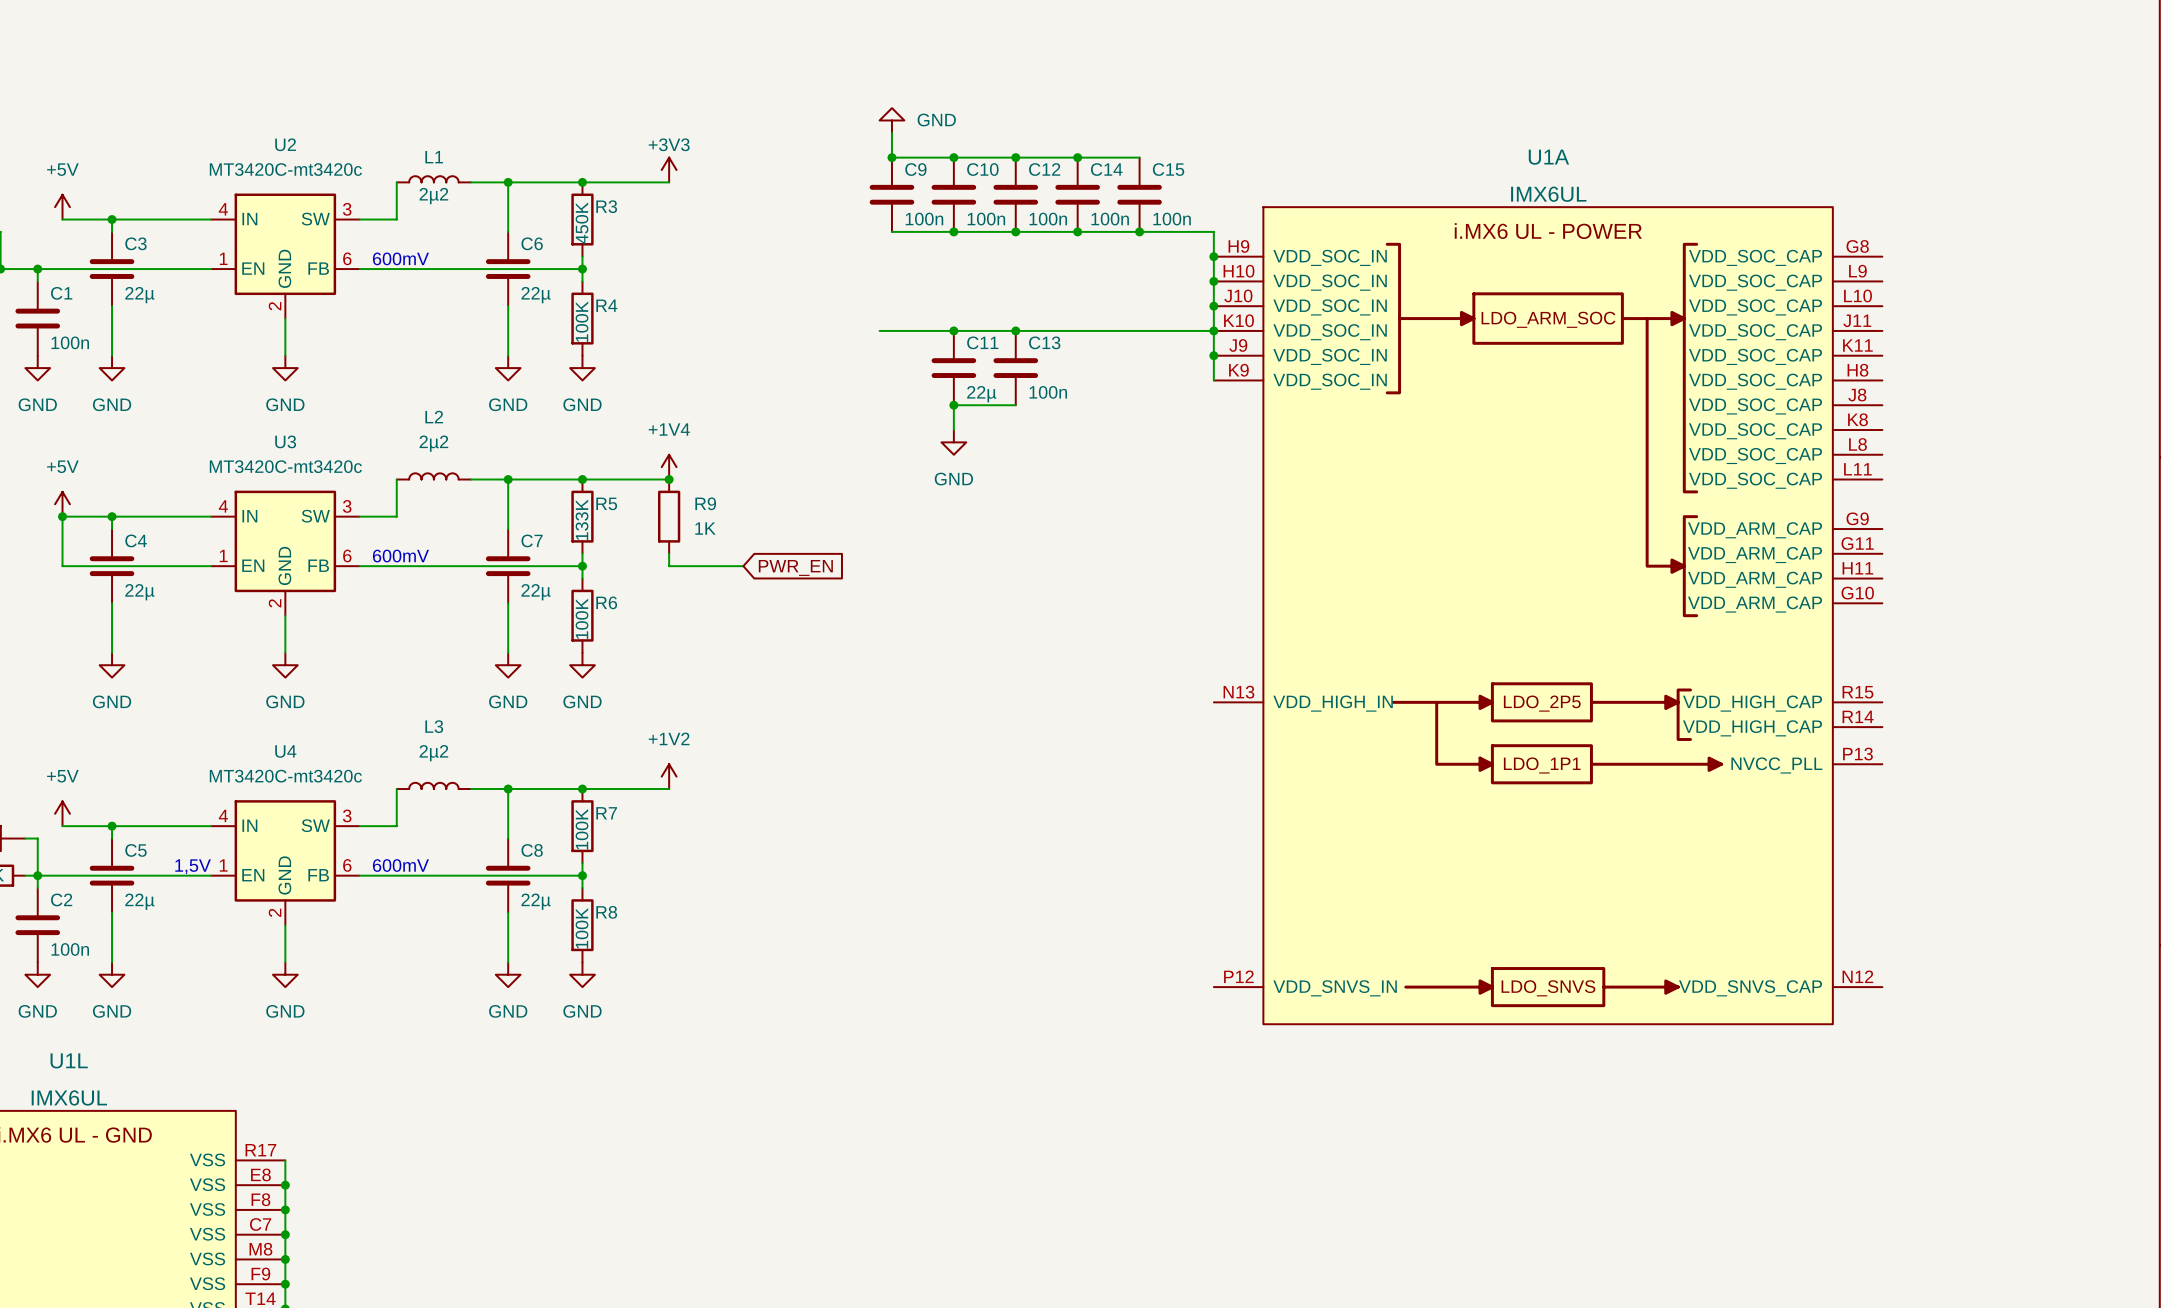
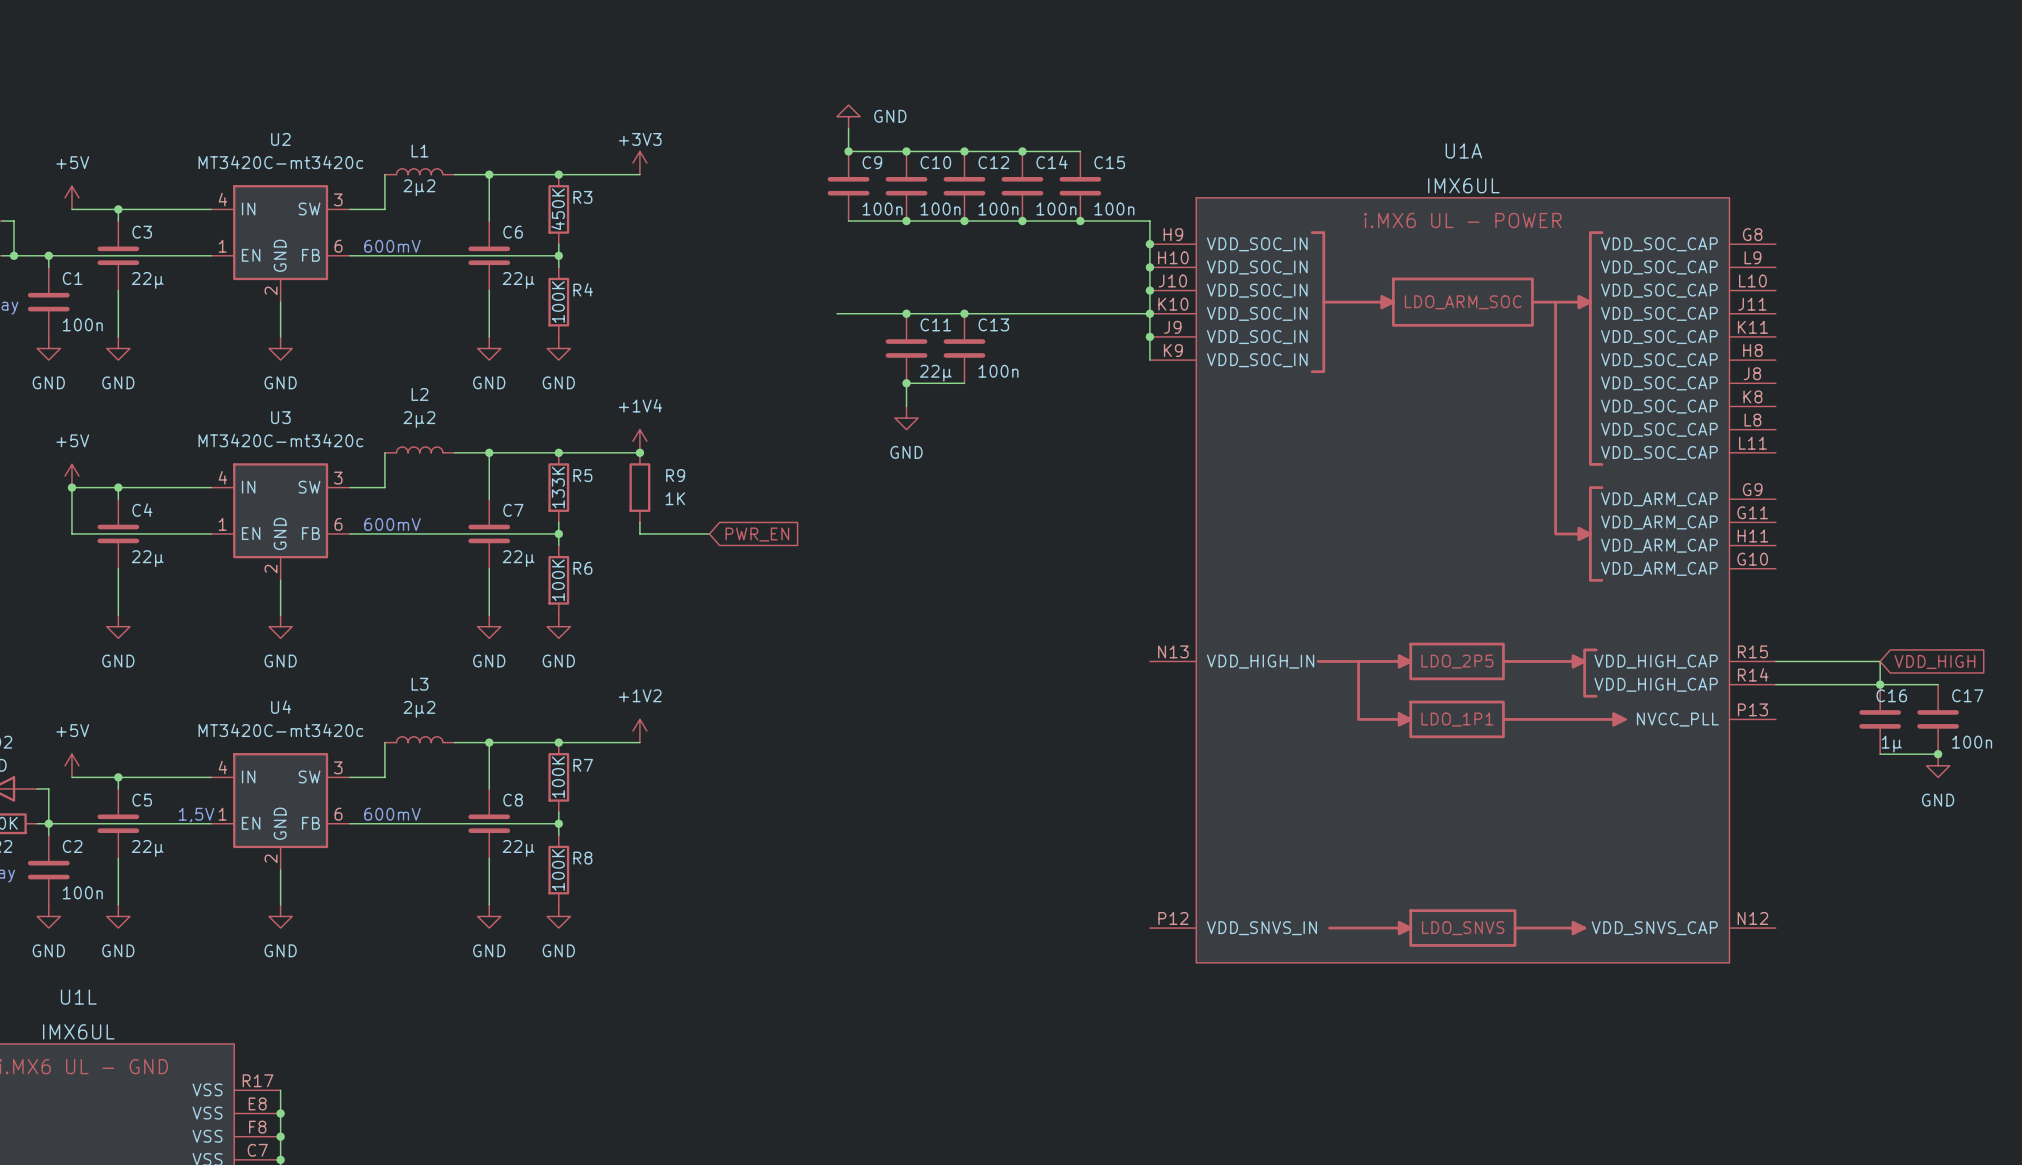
wire: none -> (1775, 661) (1880, 661) (1880, 684)
global label: none -> VDD_HIGH (1934, 662)
wire: none -> (1775, 684) (1938, 684)
junction: none -> (1880, 684)
C16: none -> 1µ (1880, 719)
C17: none -> 100n (1938, 719)
wire: none -> (1880, 754) (1938, 754)
junction: none -> (1938, 754)
power symbol: none -> GND (1938, 765)

